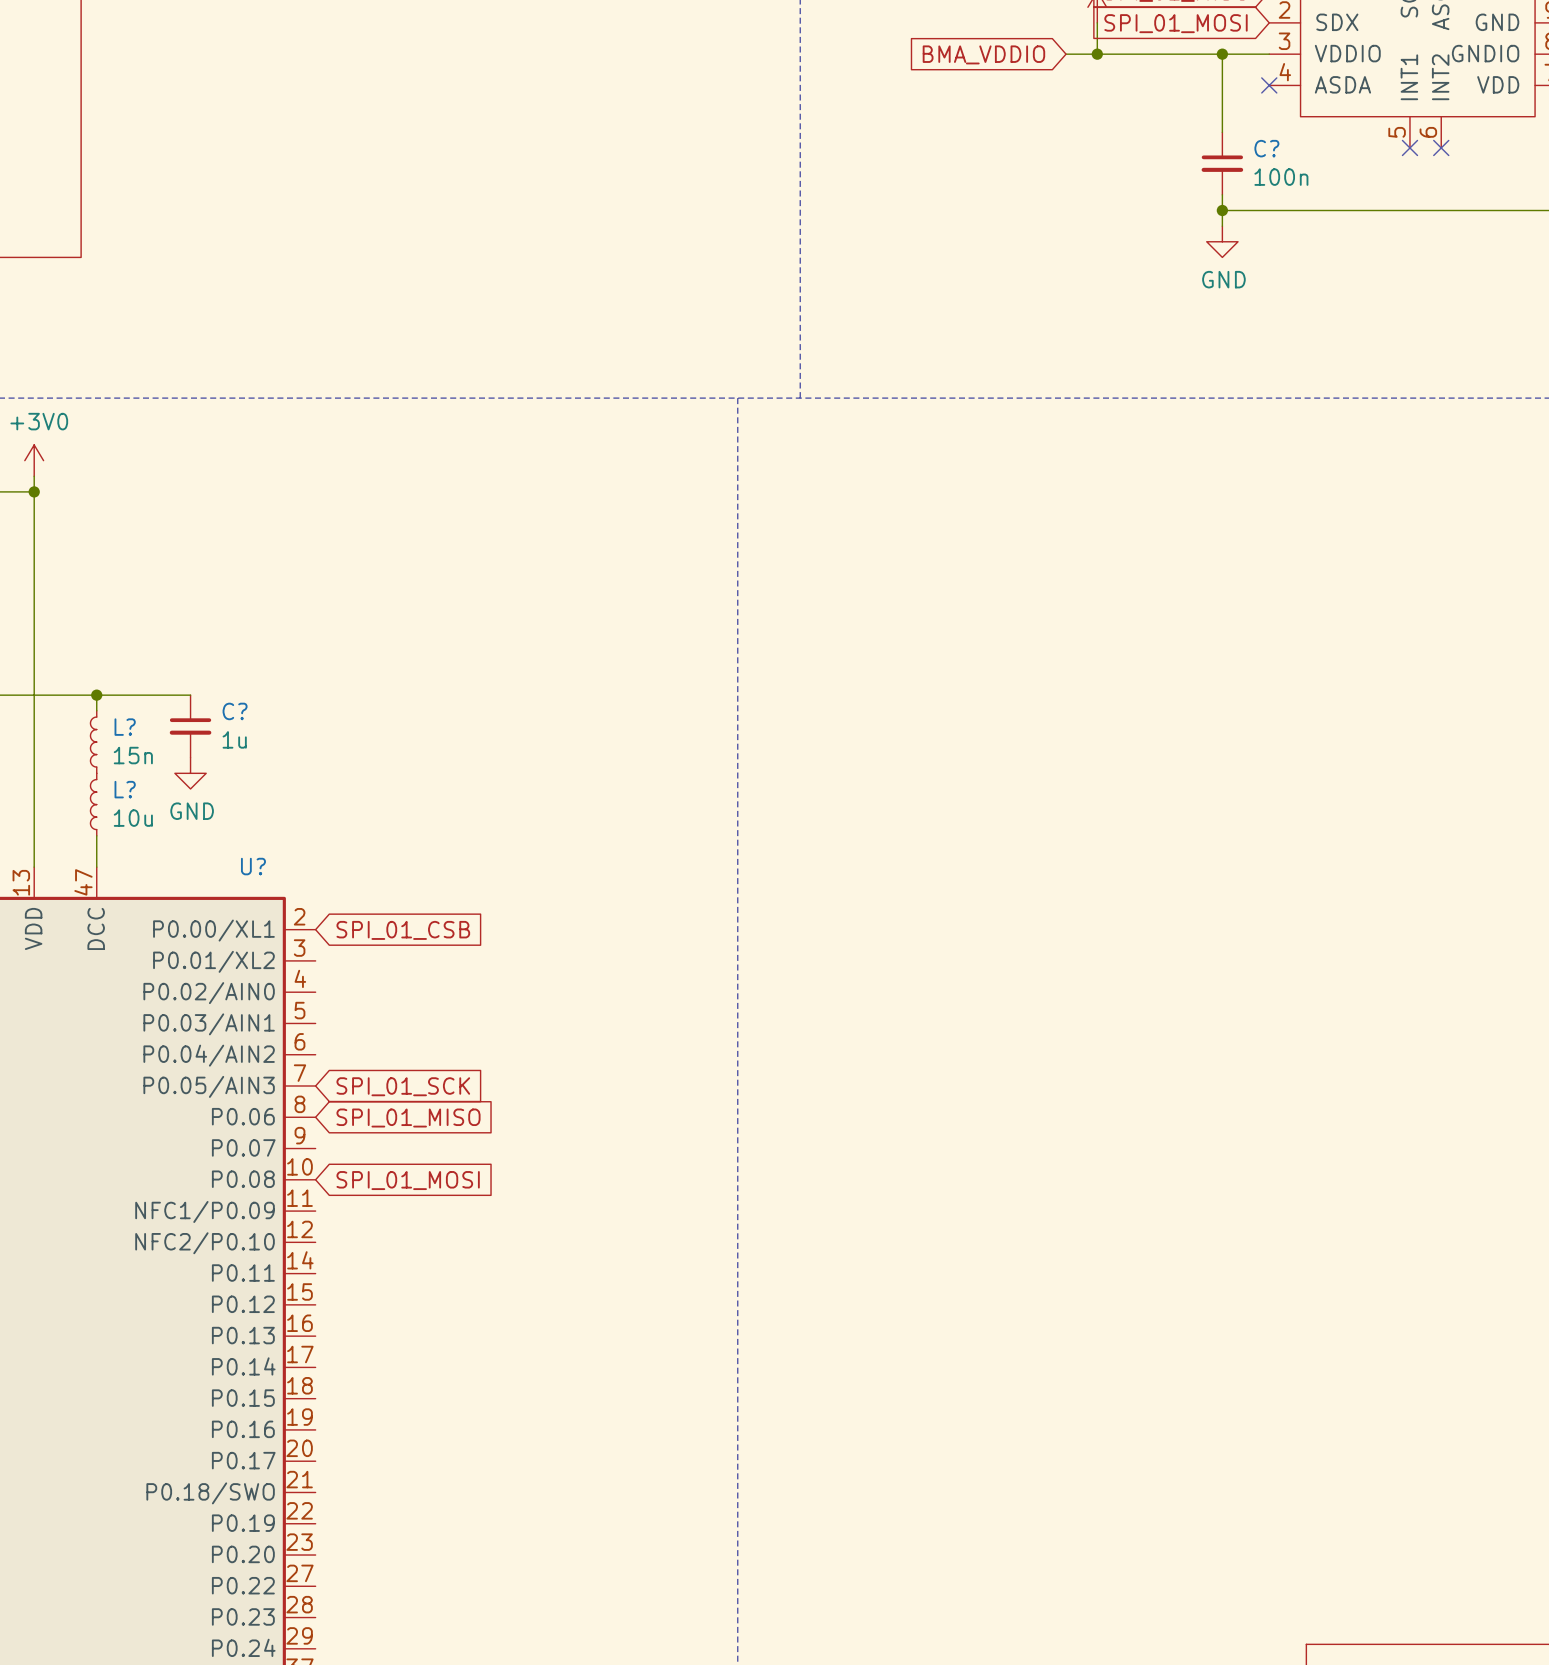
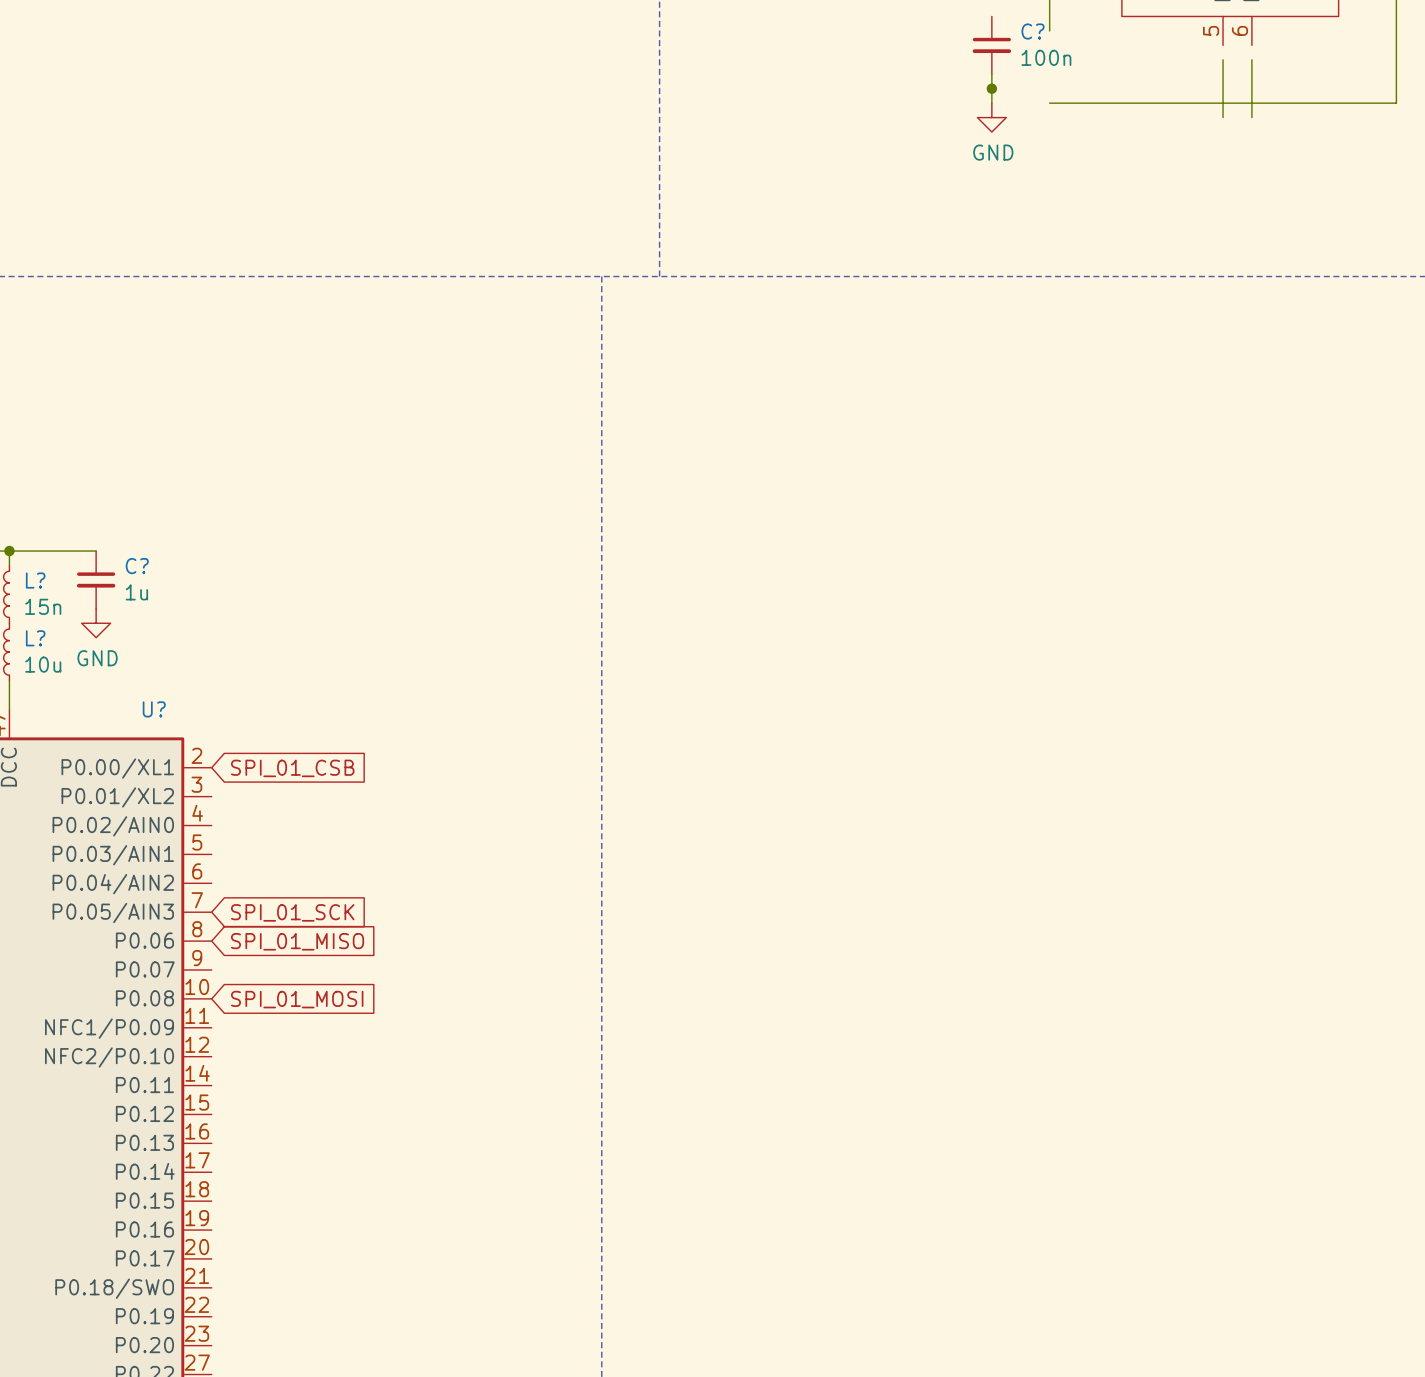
no-connect mark: (1409, 147) -> none
no-connect mark: (1441, 147) -> none
C? position: (1222, 163) -> (991, 45)
wire: none -> (1223, 59) (1223, 117)
wire: none -> (1251, 59) (1251, 117)
wire: (1222, 194) (1222, 226) -> (991, 74) (991, 103)
junction position: (1222, 210) -> (991, 88)
power symbol position: GND (1222, 241) -> GND (991, 117)

